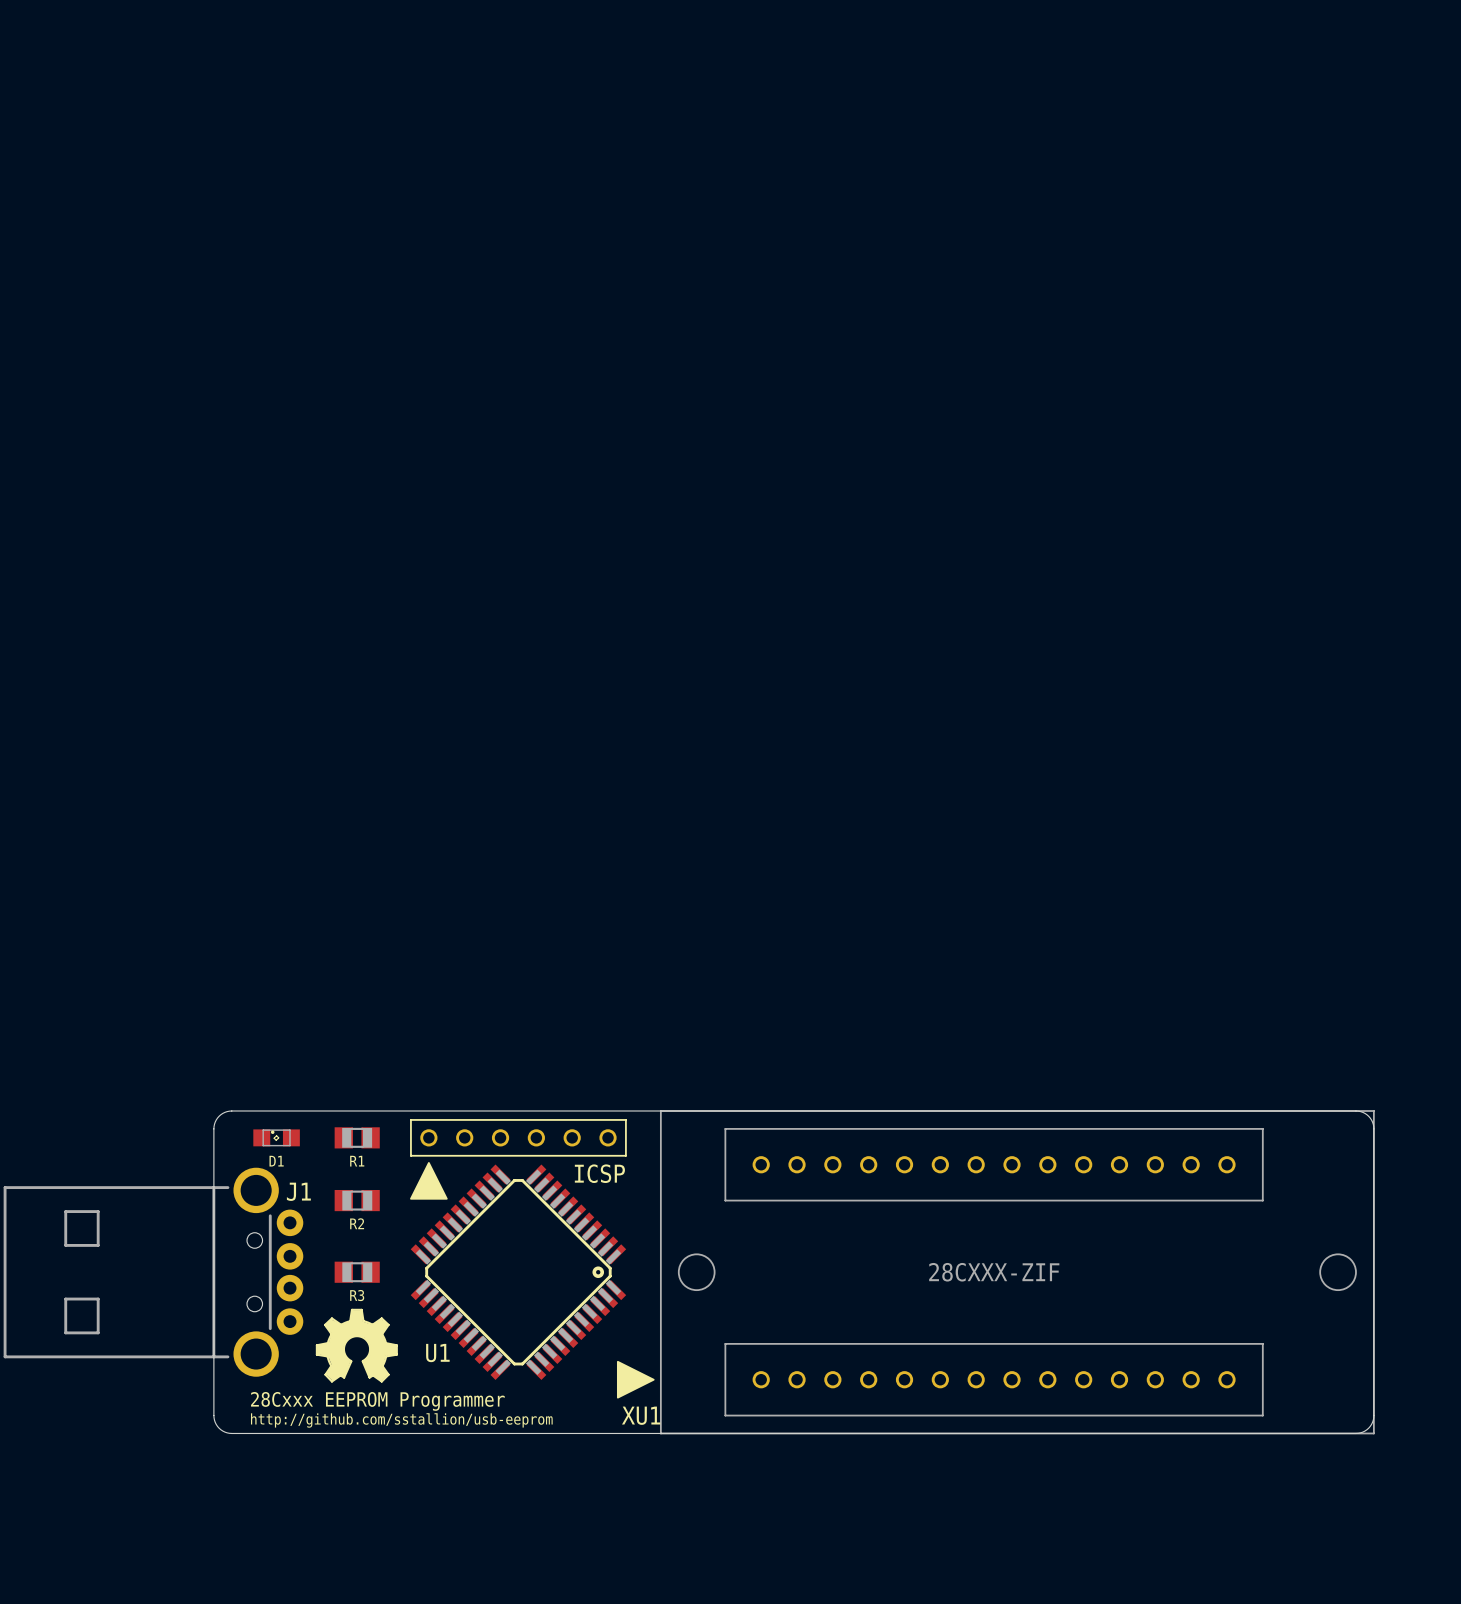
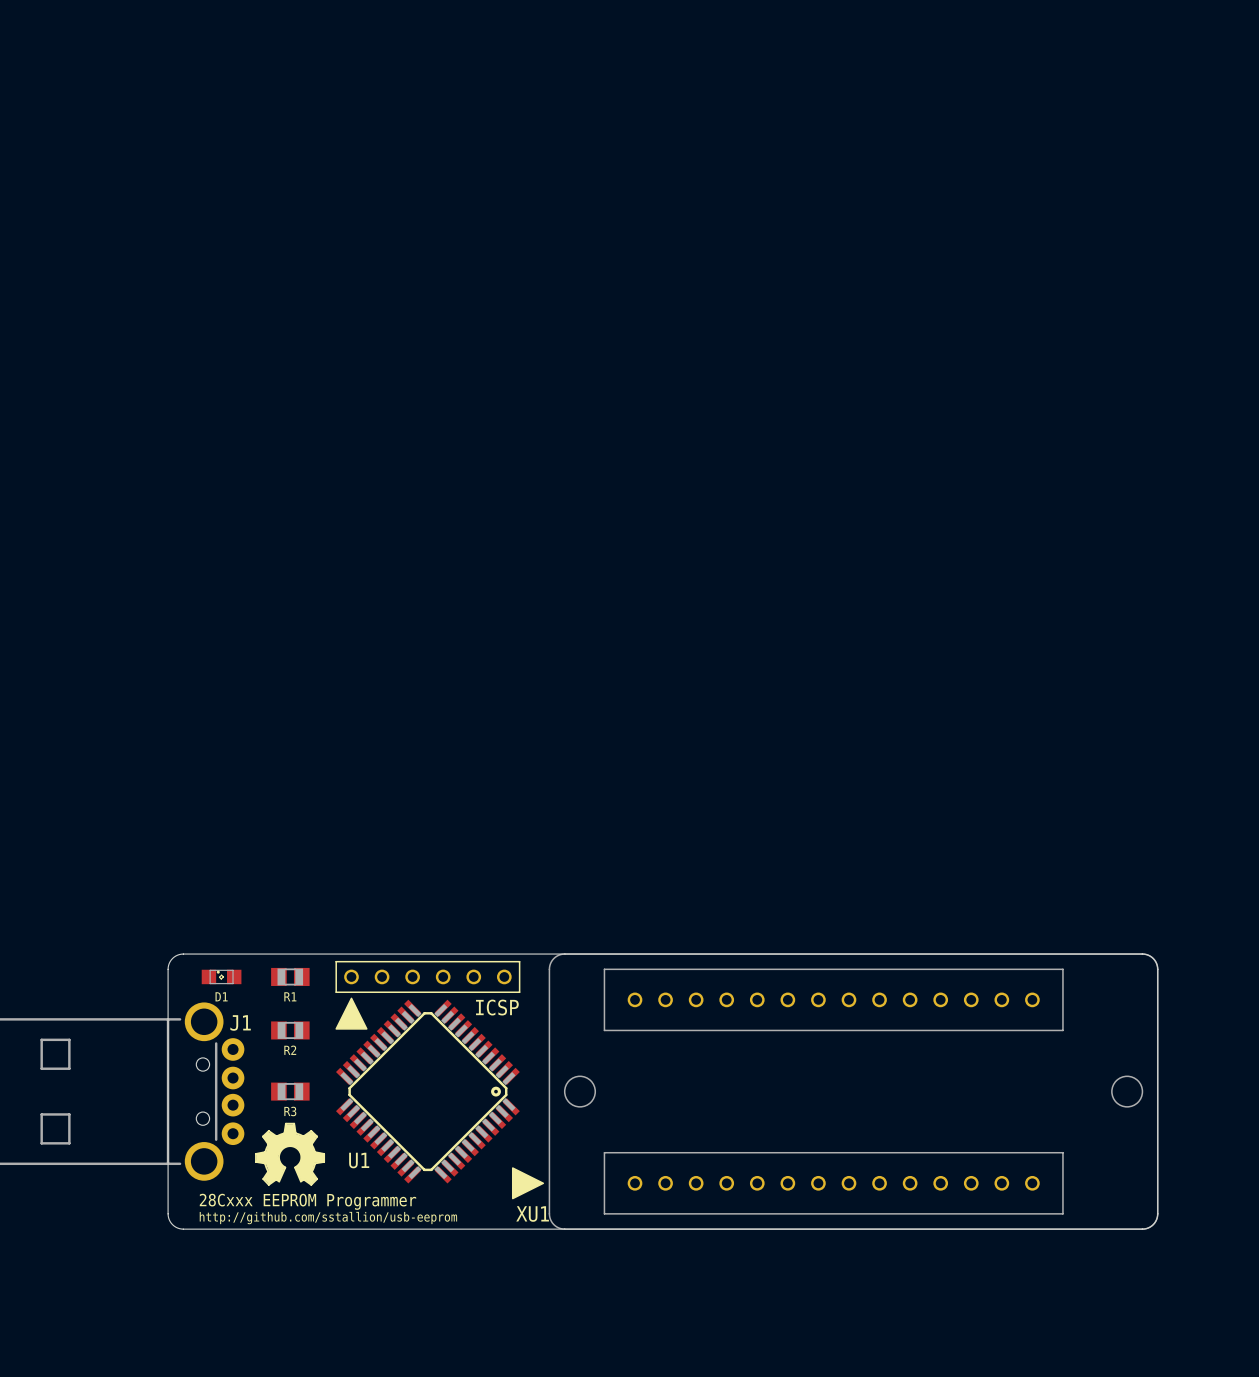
XU1 footprint: [616, 1110, 1375, 1435] -> [511, 953, 1159, 1230]
XU1 value: 28CXXX-ZIF (994, 1272) -> none

